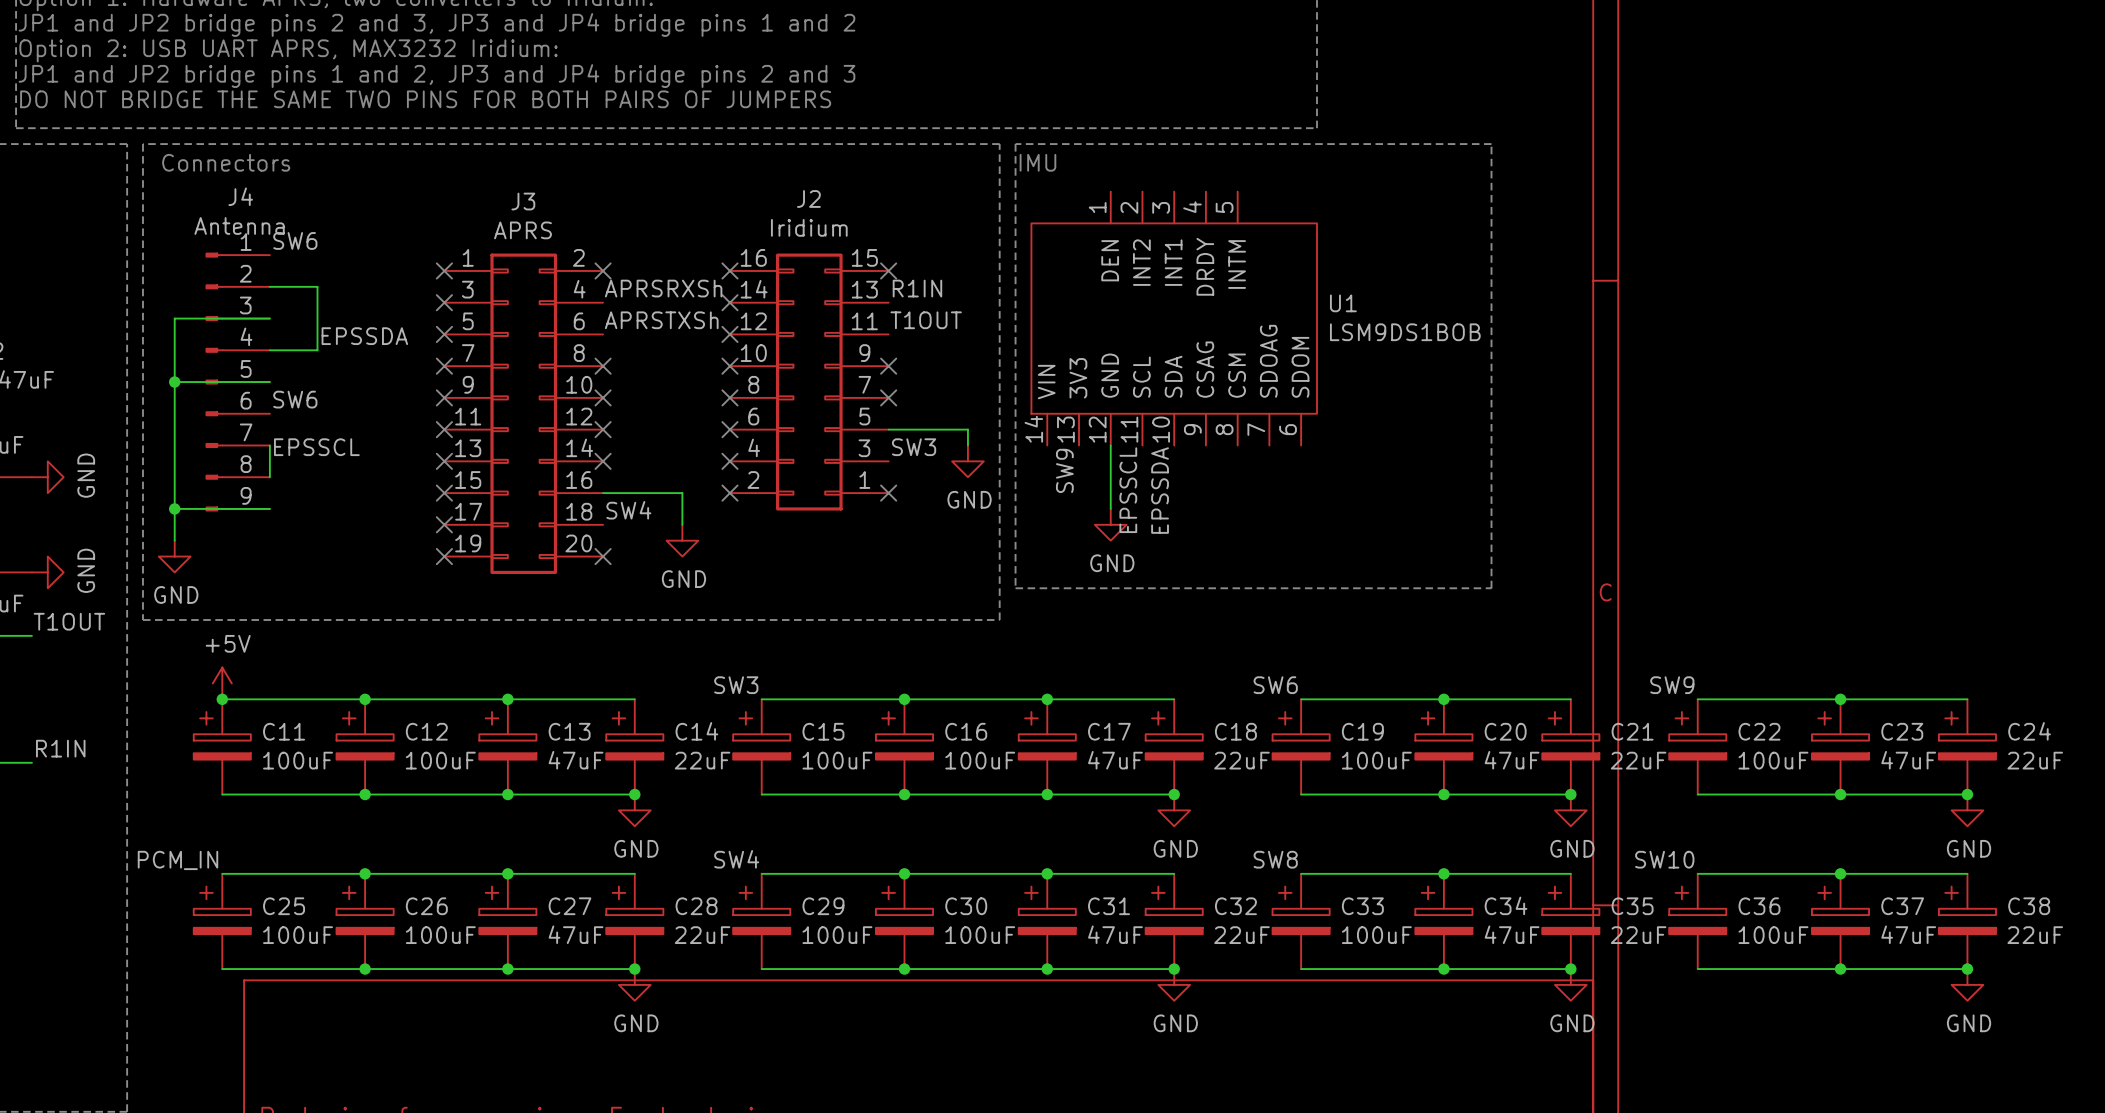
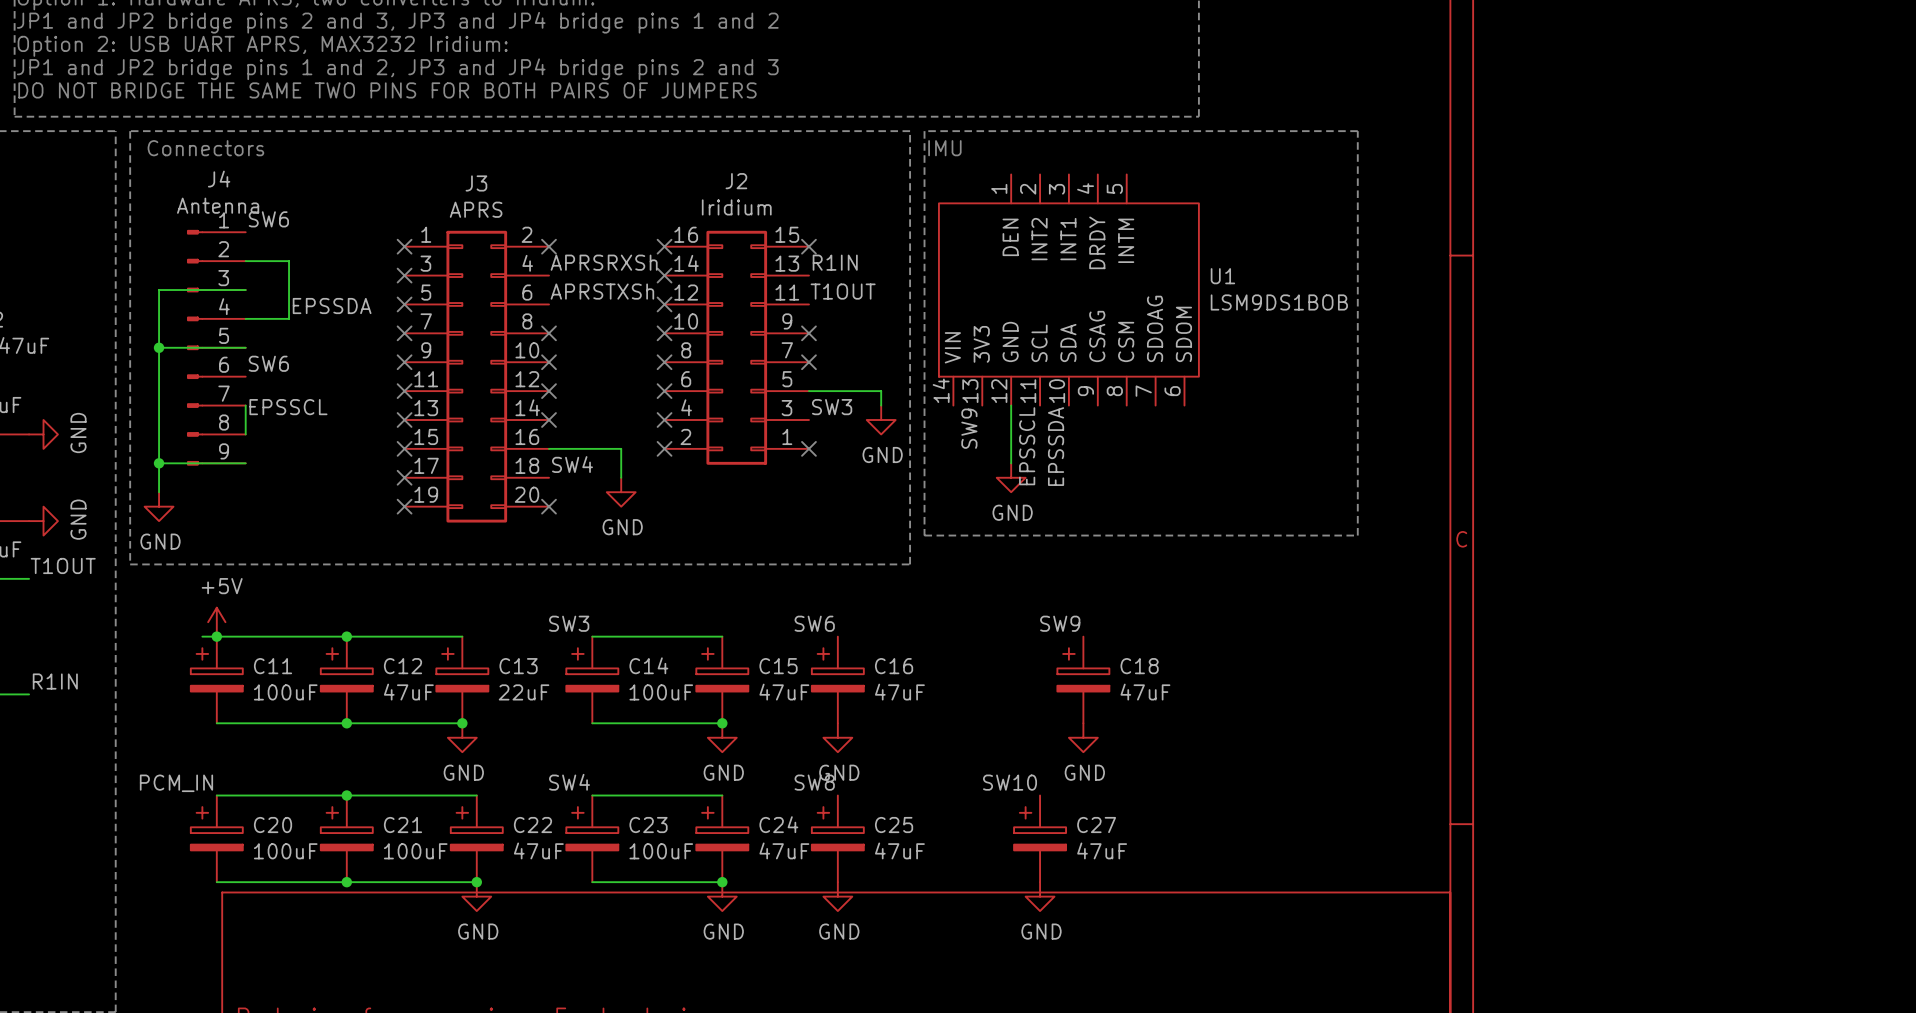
power symbol position: +5V (222, 683) -> +5V (216, 622)
label position: SW3 (736, 685) -> SW3 (569, 623)
label: none -> SW6 (814, 623)
label: none -> SW9 (1060, 623)
label: SW6 (1275, 685) -> none
label: SW9 (1672, 685) -> none
junction position: (222, 699) -> (216, 636)
junction position: (365, 699) -> (346, 636)
wire: (507, 699) (634, 699) -> none
junction: (507, 699) -> none
wire: none -> (592, 636) (693, 636)
wire: (793, 699) (1174, 699) -> none
junction: (904, 699) -> none
junction: (1047, 699) -> none
wire: (1301, 699) (1570, 699) -> none
junction: (1443, 699) -> none
wire: (1697, 699) (1967, 699) -> none
junction: (1840, 699) -> none
C11 position: (222, 746) -> (216, 679)
C12 position: (365, 746) -> (346, 679)
C14 position: (634, 746) -> (592, 679)
C15 position: (761, 746) -> (722, 679)
C16 position: (904, 746) -> (837, 679)
C17: 47uF (1047, 746) -> none
C18 position: (1174, 746) -> (1083, 679)
C19: 100uF (1301, 746) -> none
C20 position: (1443, 746) -> (216, 838)
C21 position: (1570, 746) -> (346, 838)
C22 position: (1697, 746) -> (476, 838)
C23 position: (1840, 746) -> (592, 838)
C24 position: (1967, 746) -> (722, 838)
C12 value: 100uF (440, 760) -> 47uF (408, 692)
C13 value: 47uF (576, 760) -> 22uF (524, 692)
C14 value: 22uF (702, 760) -> 100uF (661, 692)
C15 value: 100uF (837, 760) -> 47uF (784, 692)
C16 value: 100uF (980, 760) -> 47uF (899, 692)
C18 value: 22uF (1241, 760) -> 47uF (1145, 692)
C20 value: 47uF (1512, 760) -> 100uF (285, 851)
C21 value: 22uF (1638, 760) -> 100uF (415, 851)
C22 value: 100uF (1773, 760) -> 47uF (538, 850)
C23 value: 47uF (1908, 760) -> 100uF (661, 851)
C24 value: 22uF (2035, 760) -> 47uF (784, 850)
wire: (222, 794) (238, 794) -> none
junction position: (365, 794) -> (346, 723)
wire: (507, 794) (634, 794) -> none
junction: (634, 794) -> none
wire: none -> (592, 723) (693, 723)
wire: (793, 794) (1174, 794) -> none
junction: none -> (722, 723)
junction: (904, 794) -> none
junction: (1047, 794) -> none
junction: (1174, 794) -> none
wire: (1301, 794) (1570, 794) -> none
junction: (1443, 794) -> none
junction: (1570, 794) -> none
wire: (1697, 794) (1967, 794) -> none
junction: (1840, 794) -> none
junction: (1967, 794) -> none
power symbol: none -> GND (462, 737)
power symbol: GND (634, 810) -> none
power symbol: none -> GND (722, 737)
power symbol: none -> GND (837, 737)
power symbol position: GND (1174, 810) -> GND (1083, 737)
power symbol: GND (1570, 810) -> none
power symbol: GND (1967, 810) -> none
label position: SW4 (736, 859) -> SW4 (569, 782)
label: none -> SW8 (814, 782)
label: none -> SW10 (1010, 782)
label: SW8 (1275, 859) -> none
label: SW10 (1664, 859) -> none
label position: PCM_IN (177, 860) -> PCM_IN (176, 783)
wire: (222, 873) (238, 873) -> none
junction position: (365, 873) -> (346, 795)
junction: (507, 873) -> none
wire: (523, 873) (634, 873) -> (592, 795) (693, 795)
wire: (793, 873) (1174, 873) -> none
junction: (904, 873) -> none
junction: (1047, 873) -> none
wire: (1301, 873) (1570, 873) -> none
junction: (1443, 873) -> none
wire: (1697, 873) (1967, 873) -> none
junction: (1840, 873) -> none
C25 position: (222, 921) -> (837, 838)
C26: 100uF (365, 921) -> none
C27 position: (507, 921) -> (1040, 838)
C28: 22uF (634, 921) -> none
C29: 100uF (761, 921) -> none
C30: 100uF (904, 921) -> none
C31: 47uF (1047, 921) -> none
C32: 22uF (1174, 921) -> none
C33: 100uF (1301, 921) -> none
C34: 47uF (1443, 921) -> none
C35: 22uF (1570, 921) -> none
C36: 100uF (1697, 921) -> none
C37: 47uF (1840, 921) -> none
C38: 22uF (1967, 921) -> none
C25 value: 100uF (298, 935) -> 47uF (899, 850)
wire: (222, 969) (238, 969) -> none
junction position: (365, 969) -> (346, 882)
junction position: (507, 969) -> (476, 882)
wire: (523, 969) (634, 969) -> (592, 882) (693, 882)
junction: (634, 969) -> none
wire: (793, 969) (1174, 969) -> none
junction: none -> (722, 882)
junction: (904, 969) -> none
junction: (1047, 969) -> none
junction: (1174, 969) -> none
wire: (1301, 969) (1570, 969) -> none
junction: (1443, 969) -> none
junction: (1570, 969) -> none
wire: (1697, 969) (1967, 969) -> none
junction: (1840, 969) -> none
junction: (1967, 969) -> none
power symbol: none -> GND (476, 896)
power symbol: GND (634, 984) -> none
power symbol: none -> GND (722, 896)
power symbol: none -> GND (837, 896)
power symbol position: GND (1174, 984) -> GND (1040, 896)
power symbol: GND (1570, 984) -> none
power symbol: GND (1967, 984) -> none

